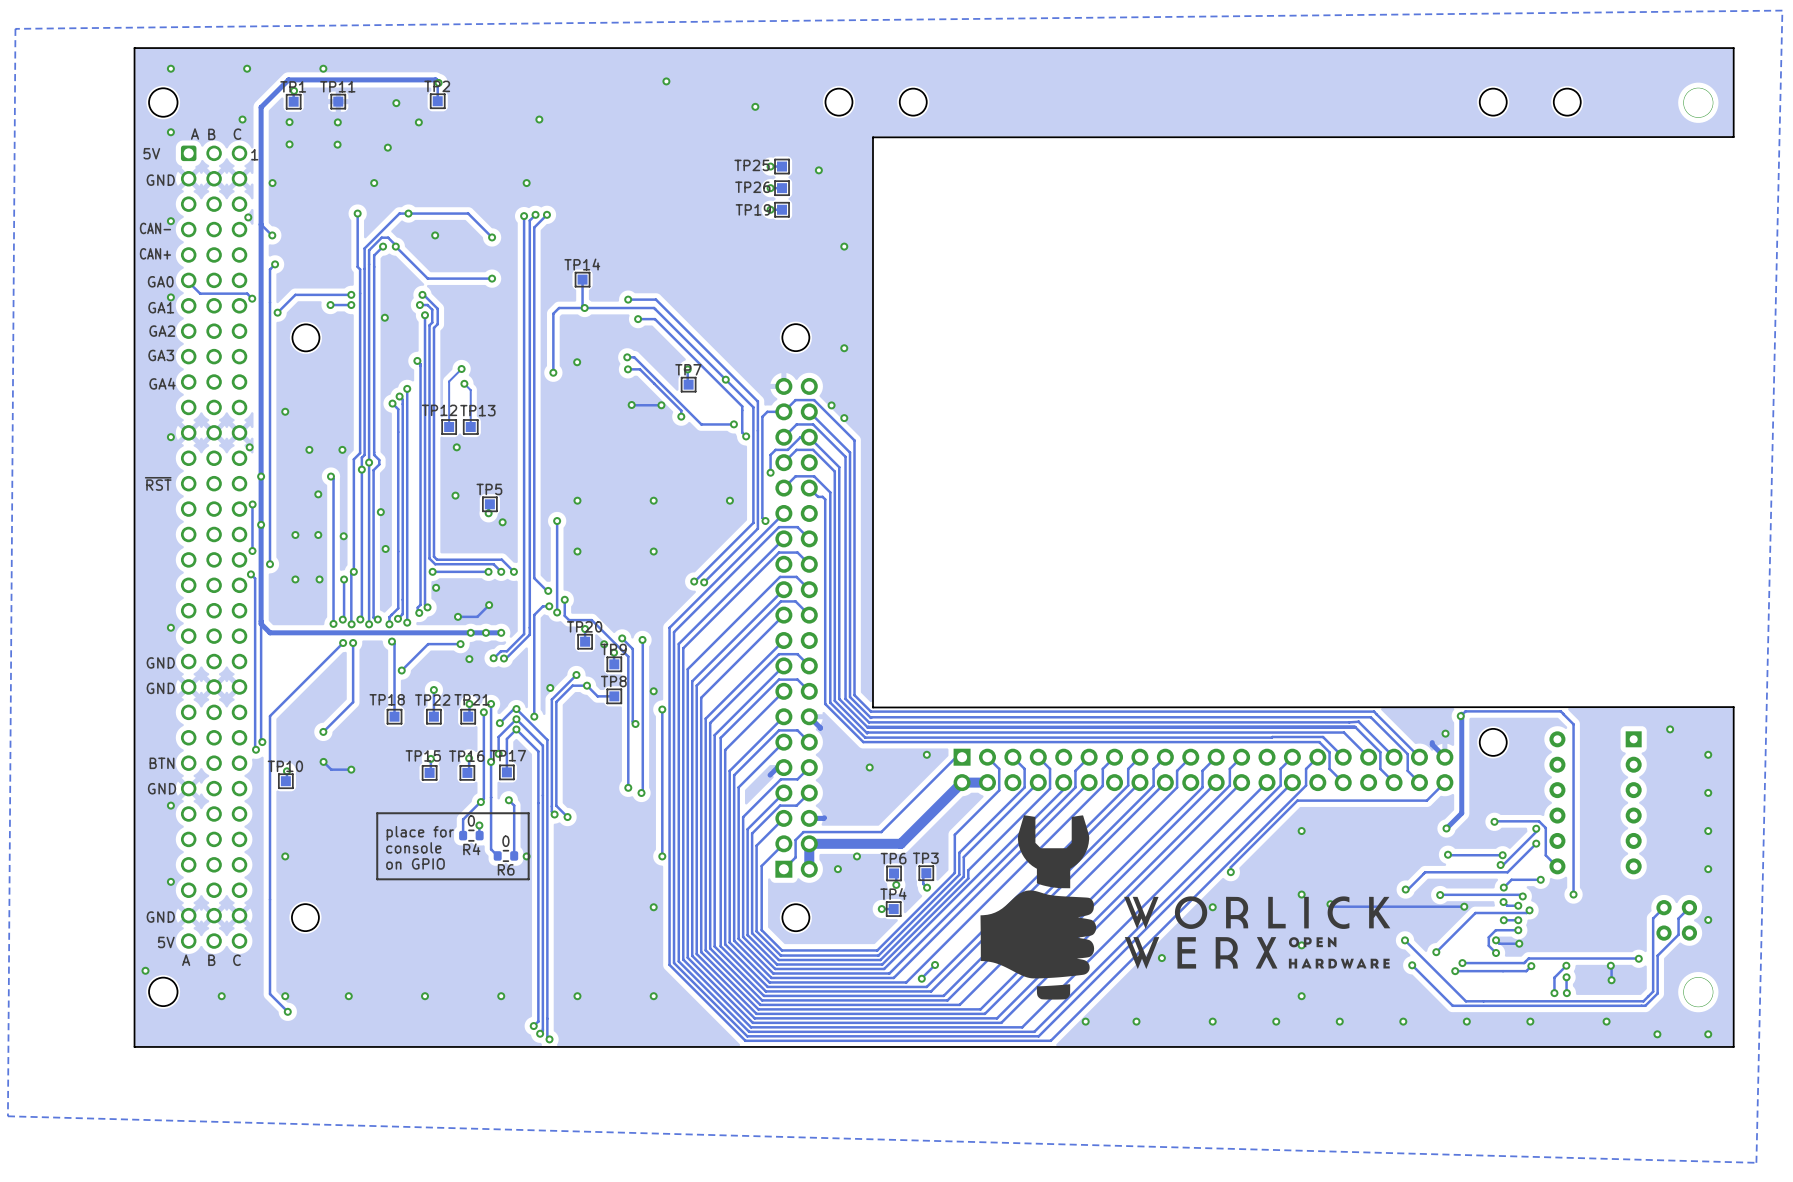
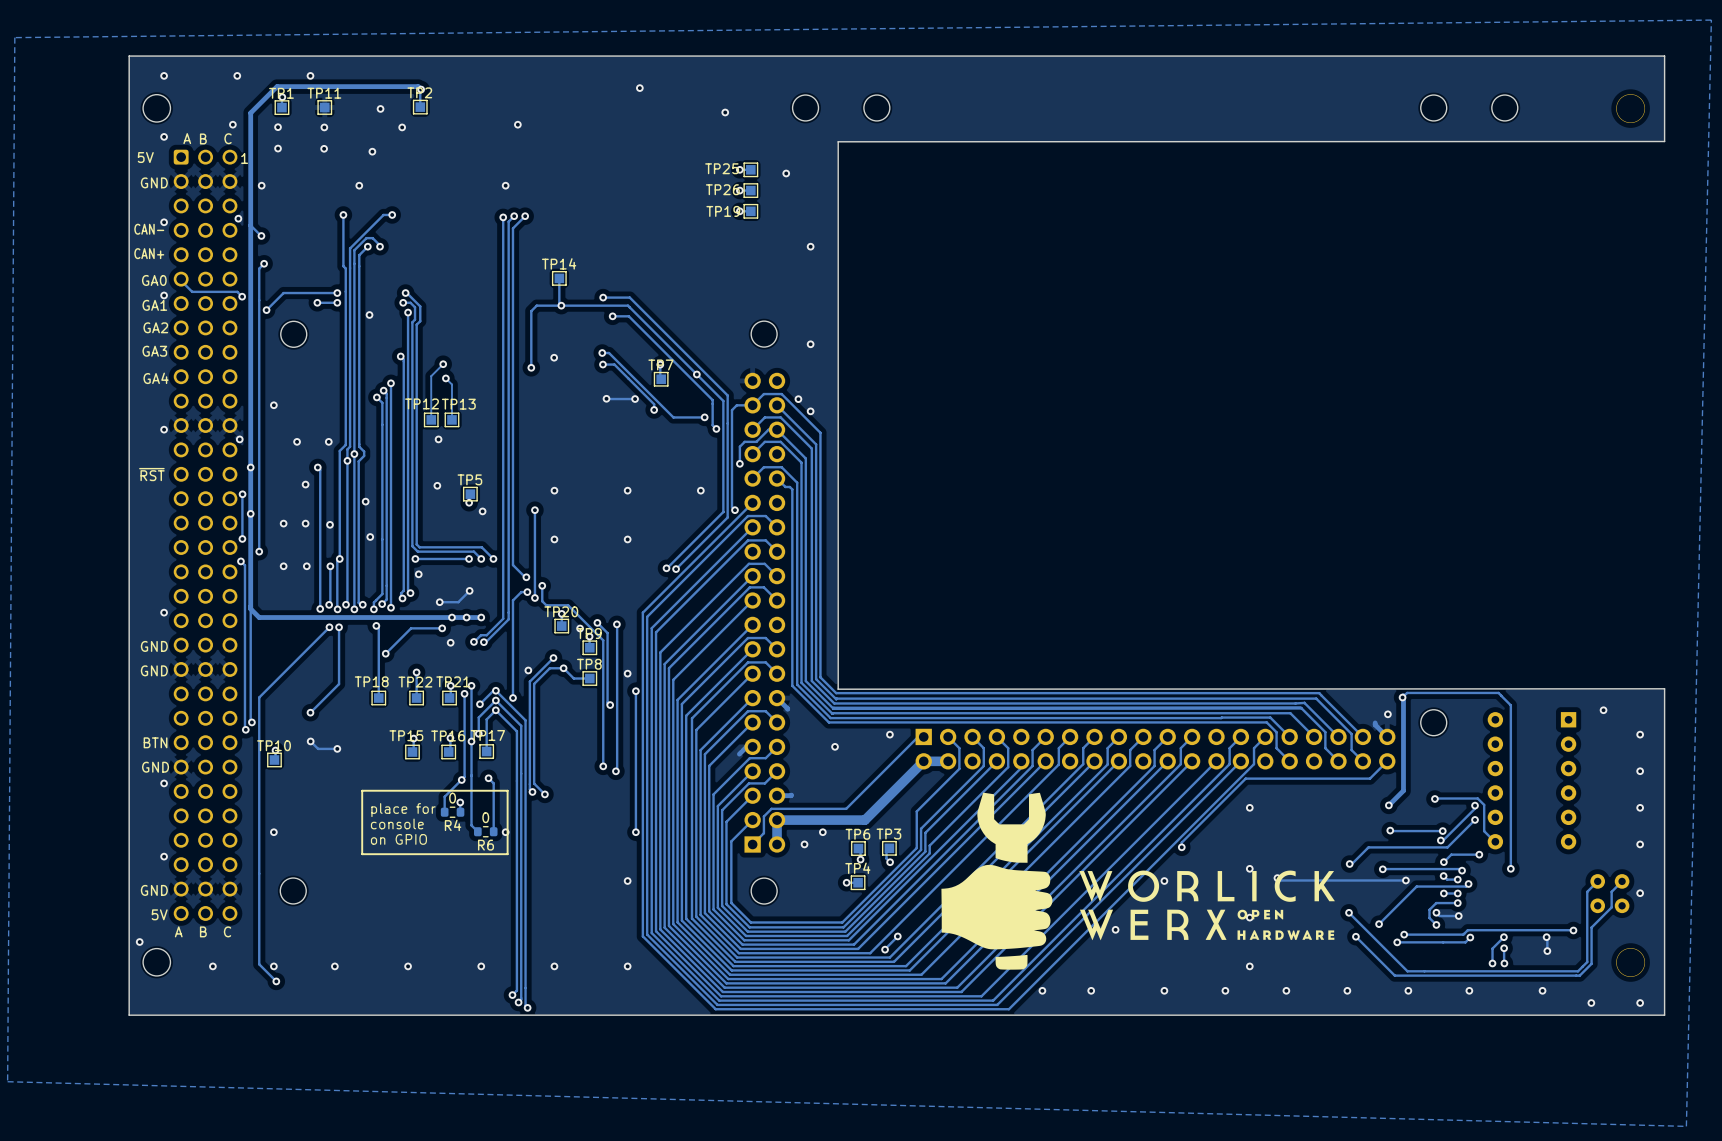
track: (408, 213) (468, 213) (492, 237) -> none
via: (435, 235) -> none
via: (492, 237) -> none
track: (395, 246) (427, 278) (492, 278) -> none
via: (492, 278) -> none

